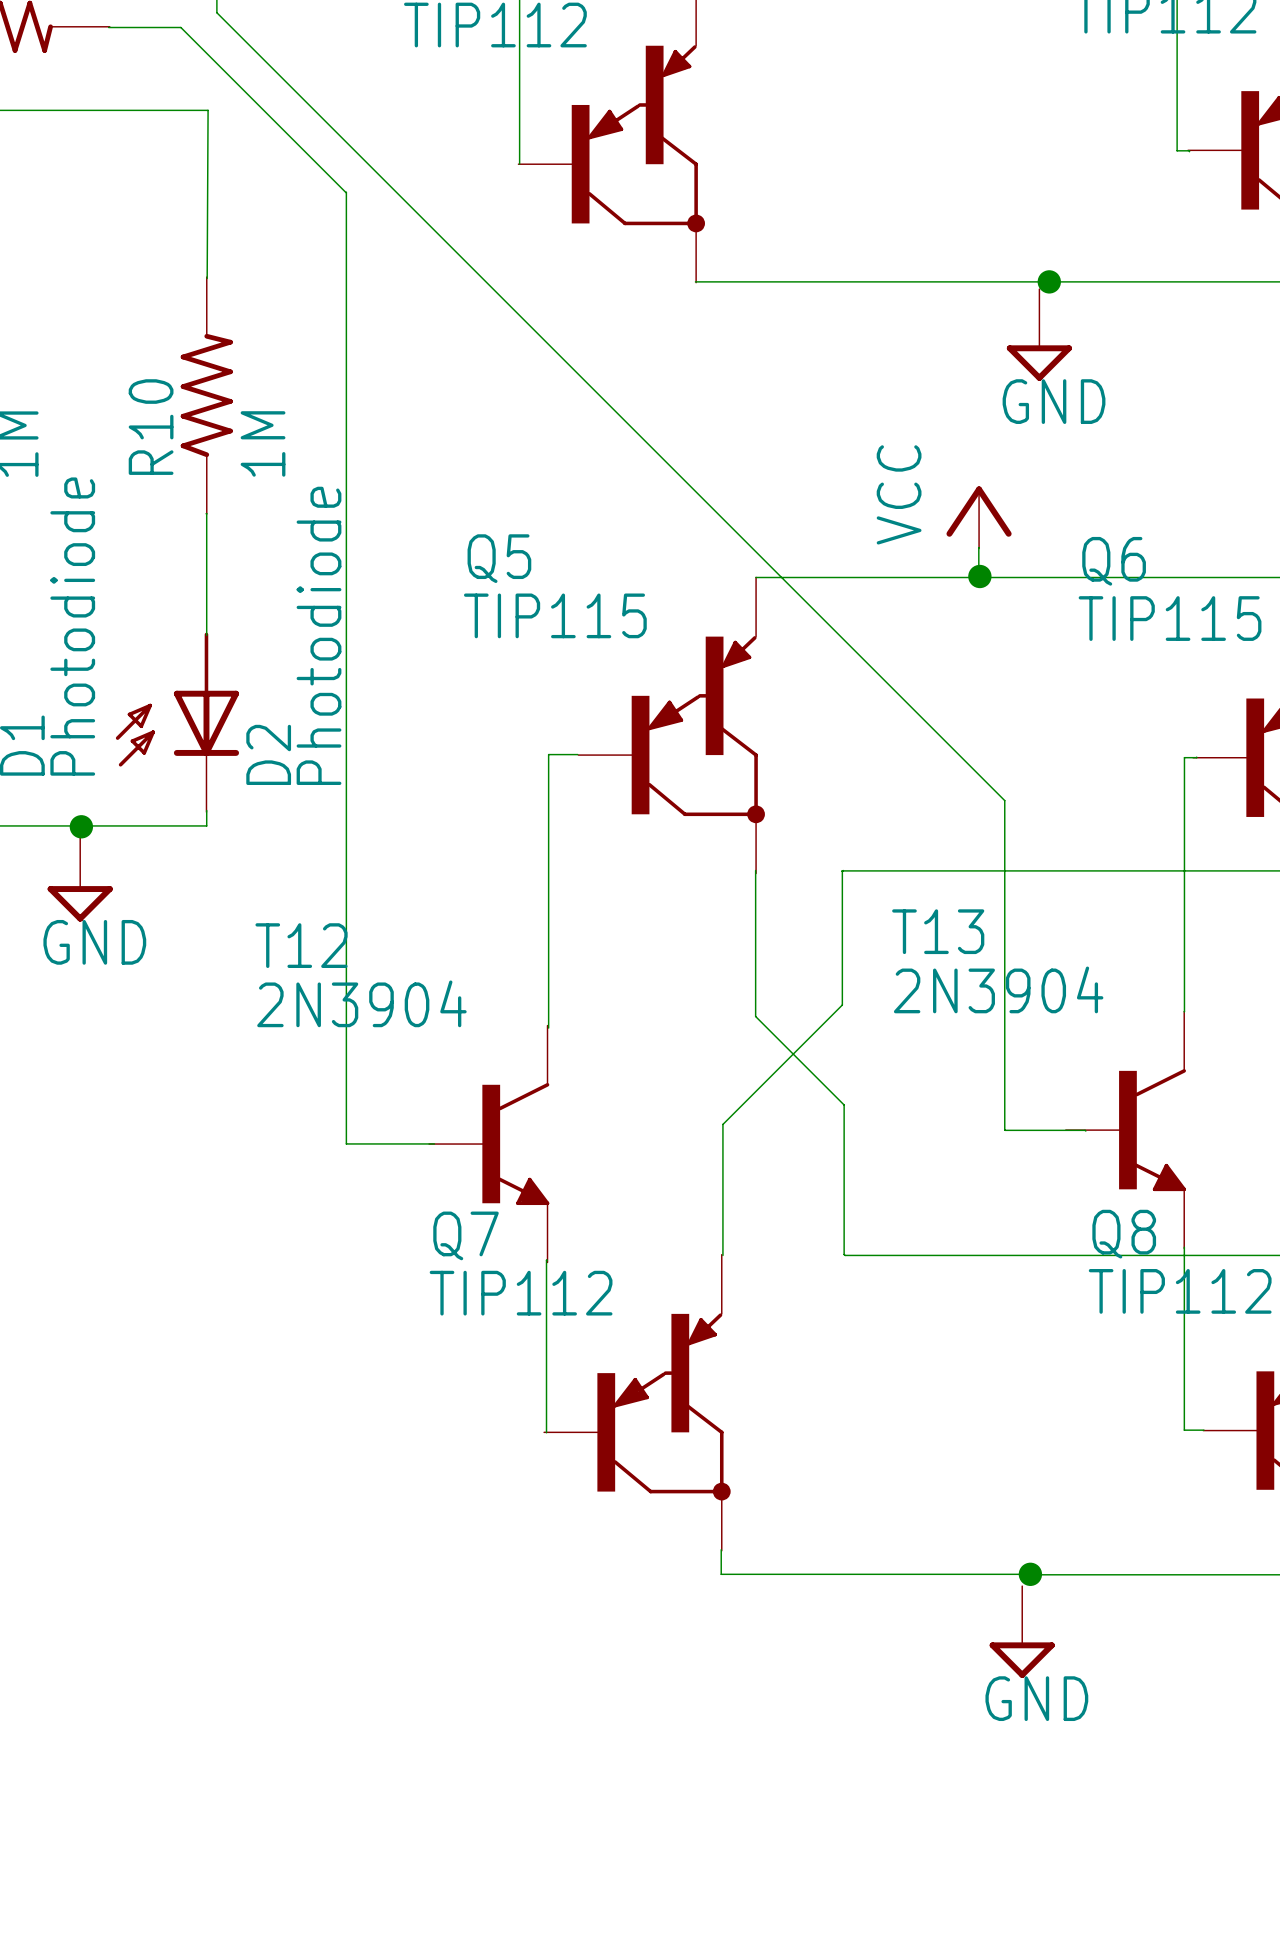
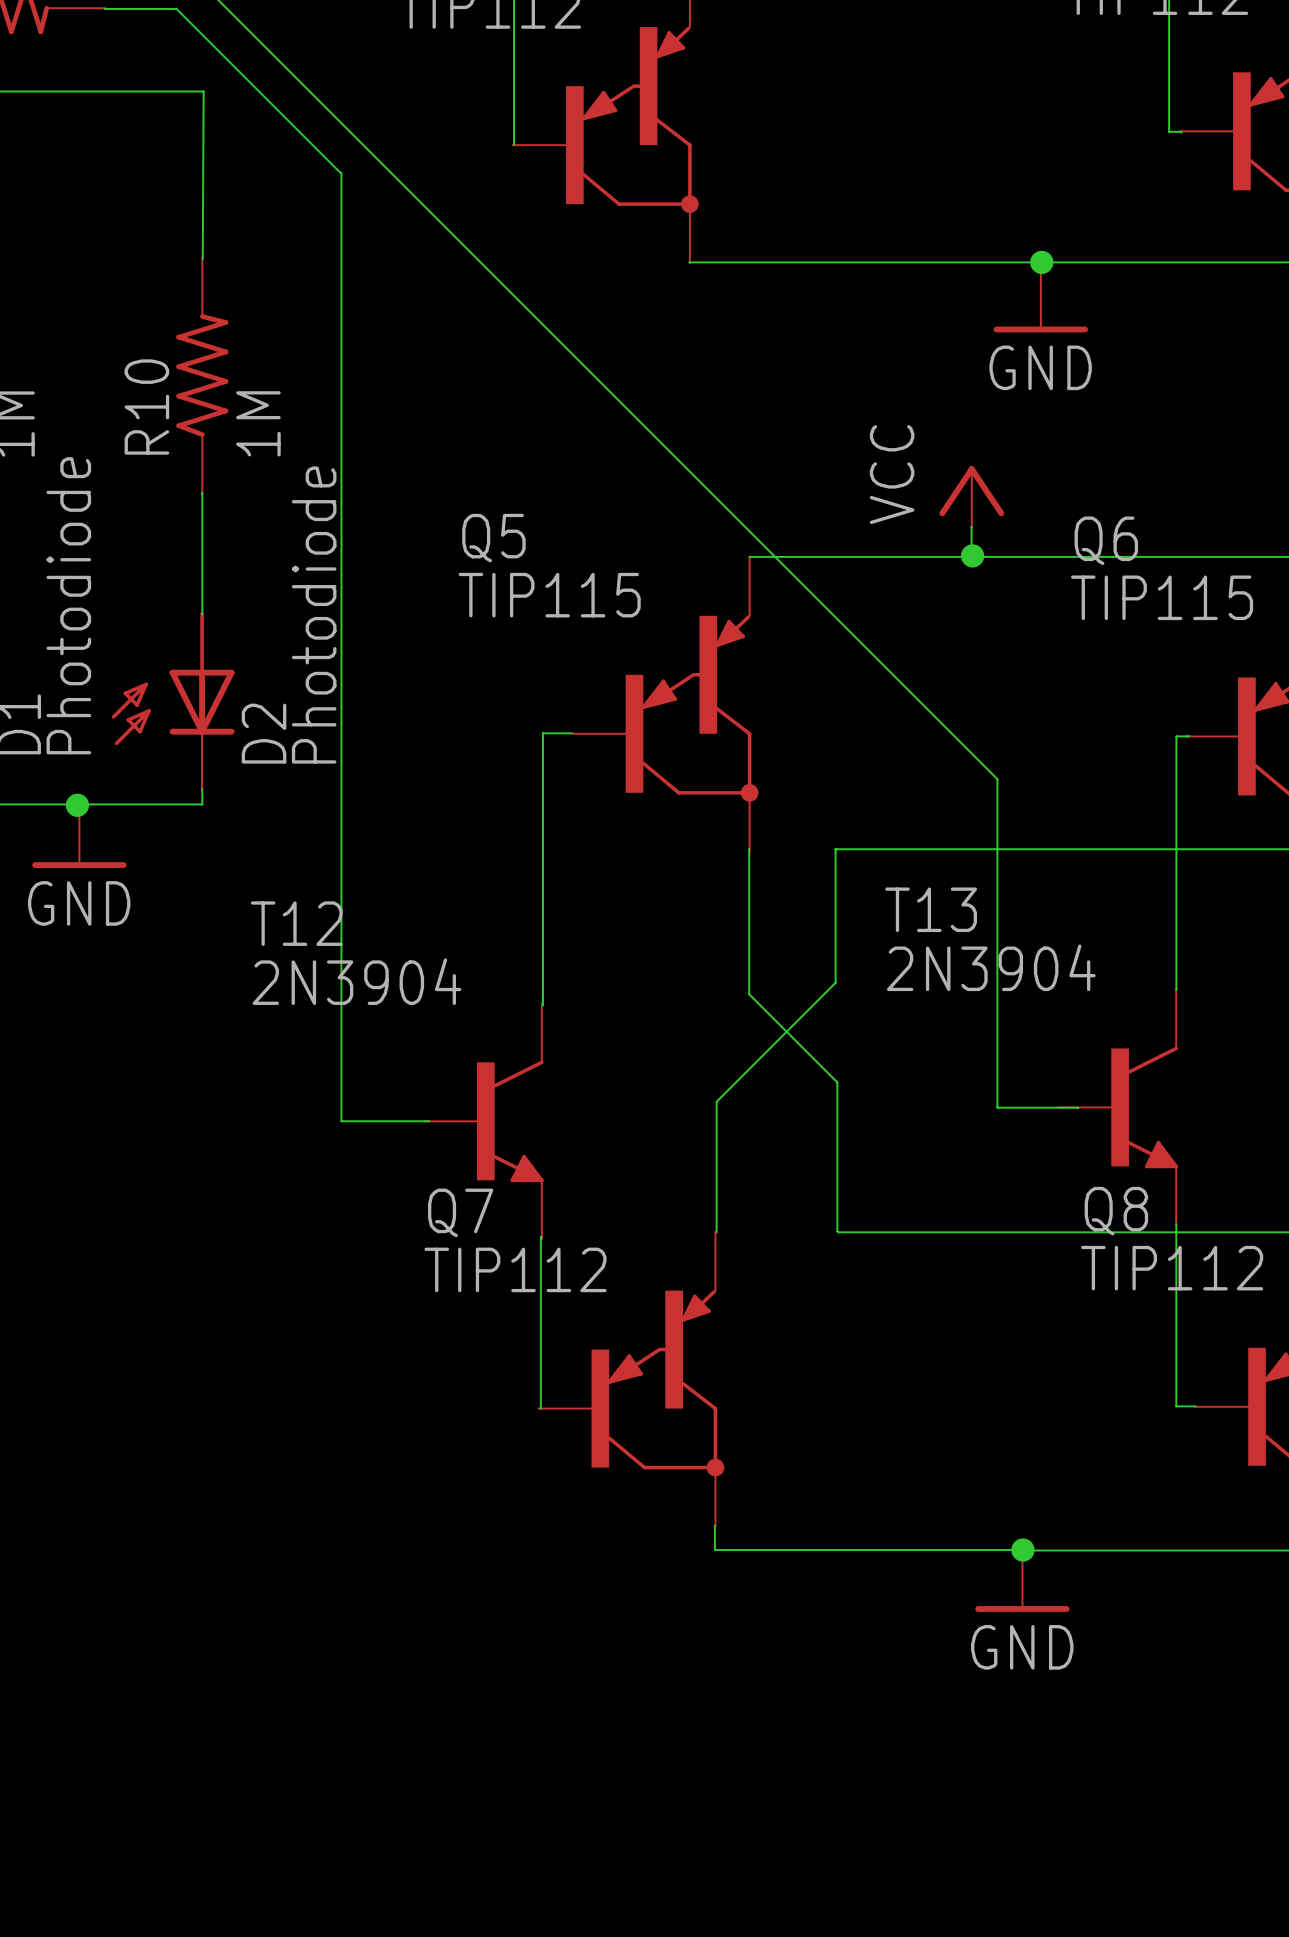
power symbol shape: [1006, 289, 1072, 381] -> [993, 270, 1089, 333]
power symbol shape: [47, 829, 113, 922] -> [32, 806, 127, 869]
power symbol: none -> GND (1022, 1580)
power symbol: GND (1022, 1632) -> none

